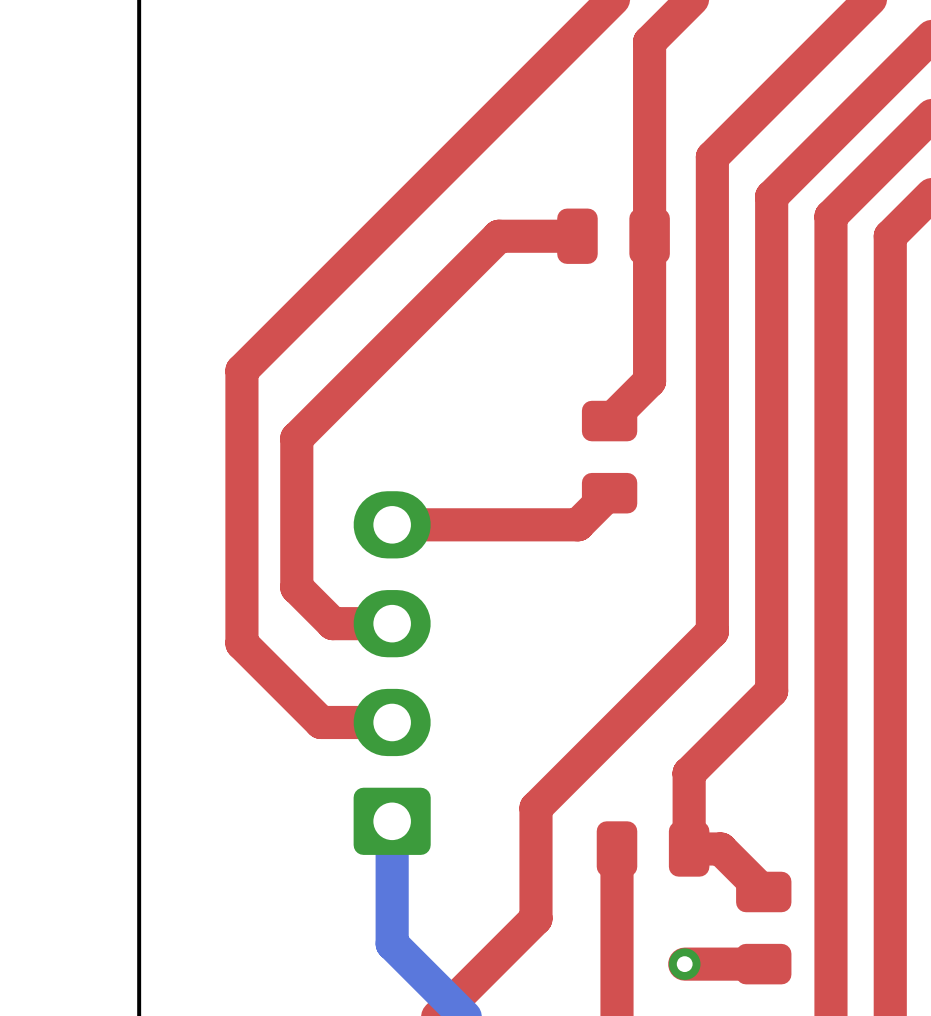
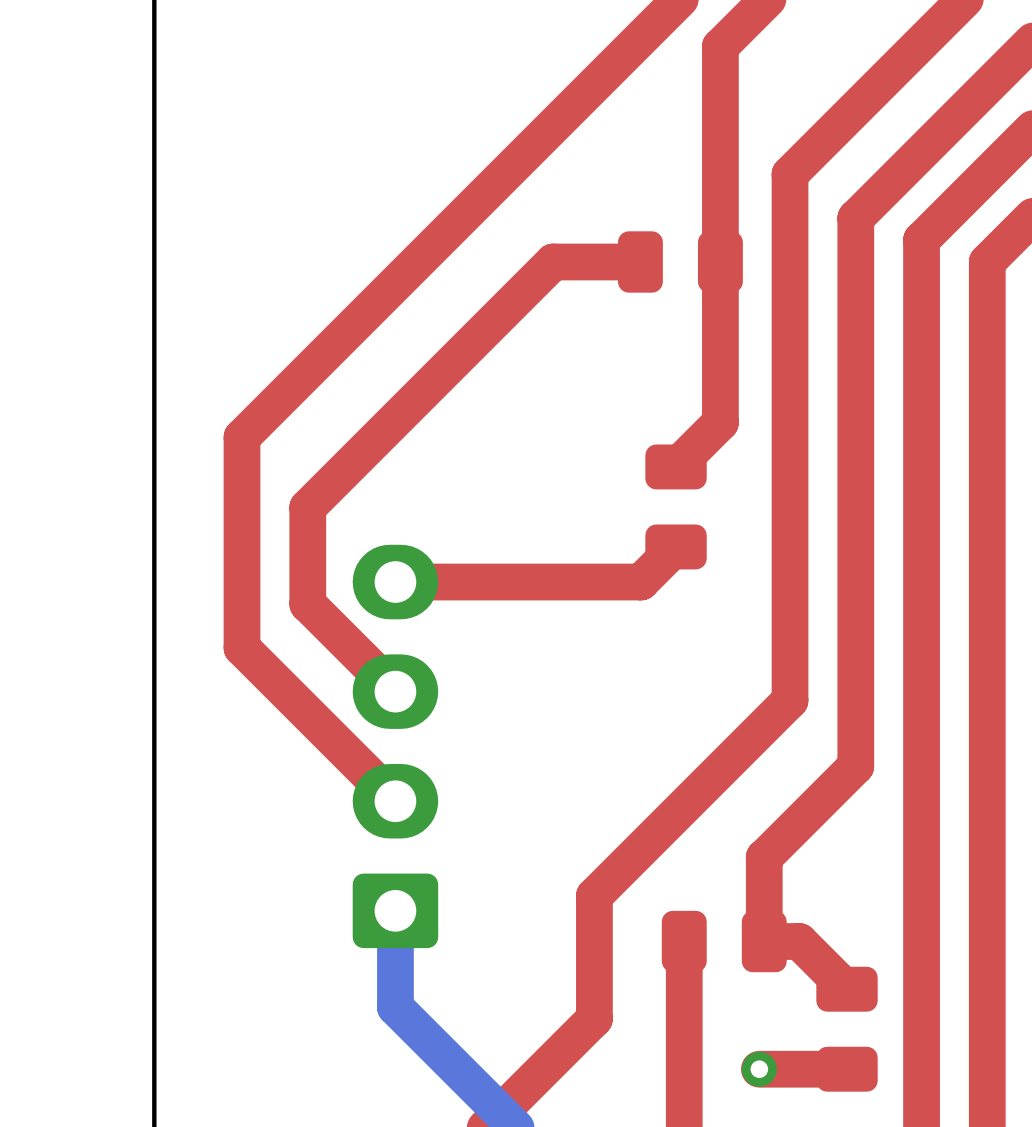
top track: (241, 370) (241, 643) (321, 722) (392, 722) -> (268, 411) (242, 437) (242, 647) (395, 801)
top track: (296, 438) (296, 587) (332, 623) (392, 623) -> (329, 486) (307, 507) (307, 603) (395, 691)
part position: (392, 673) -> (395, 746)
bottom track: (392, 821) (392, 943) -> (395, 910) (395, 1007) (434, 1046)

